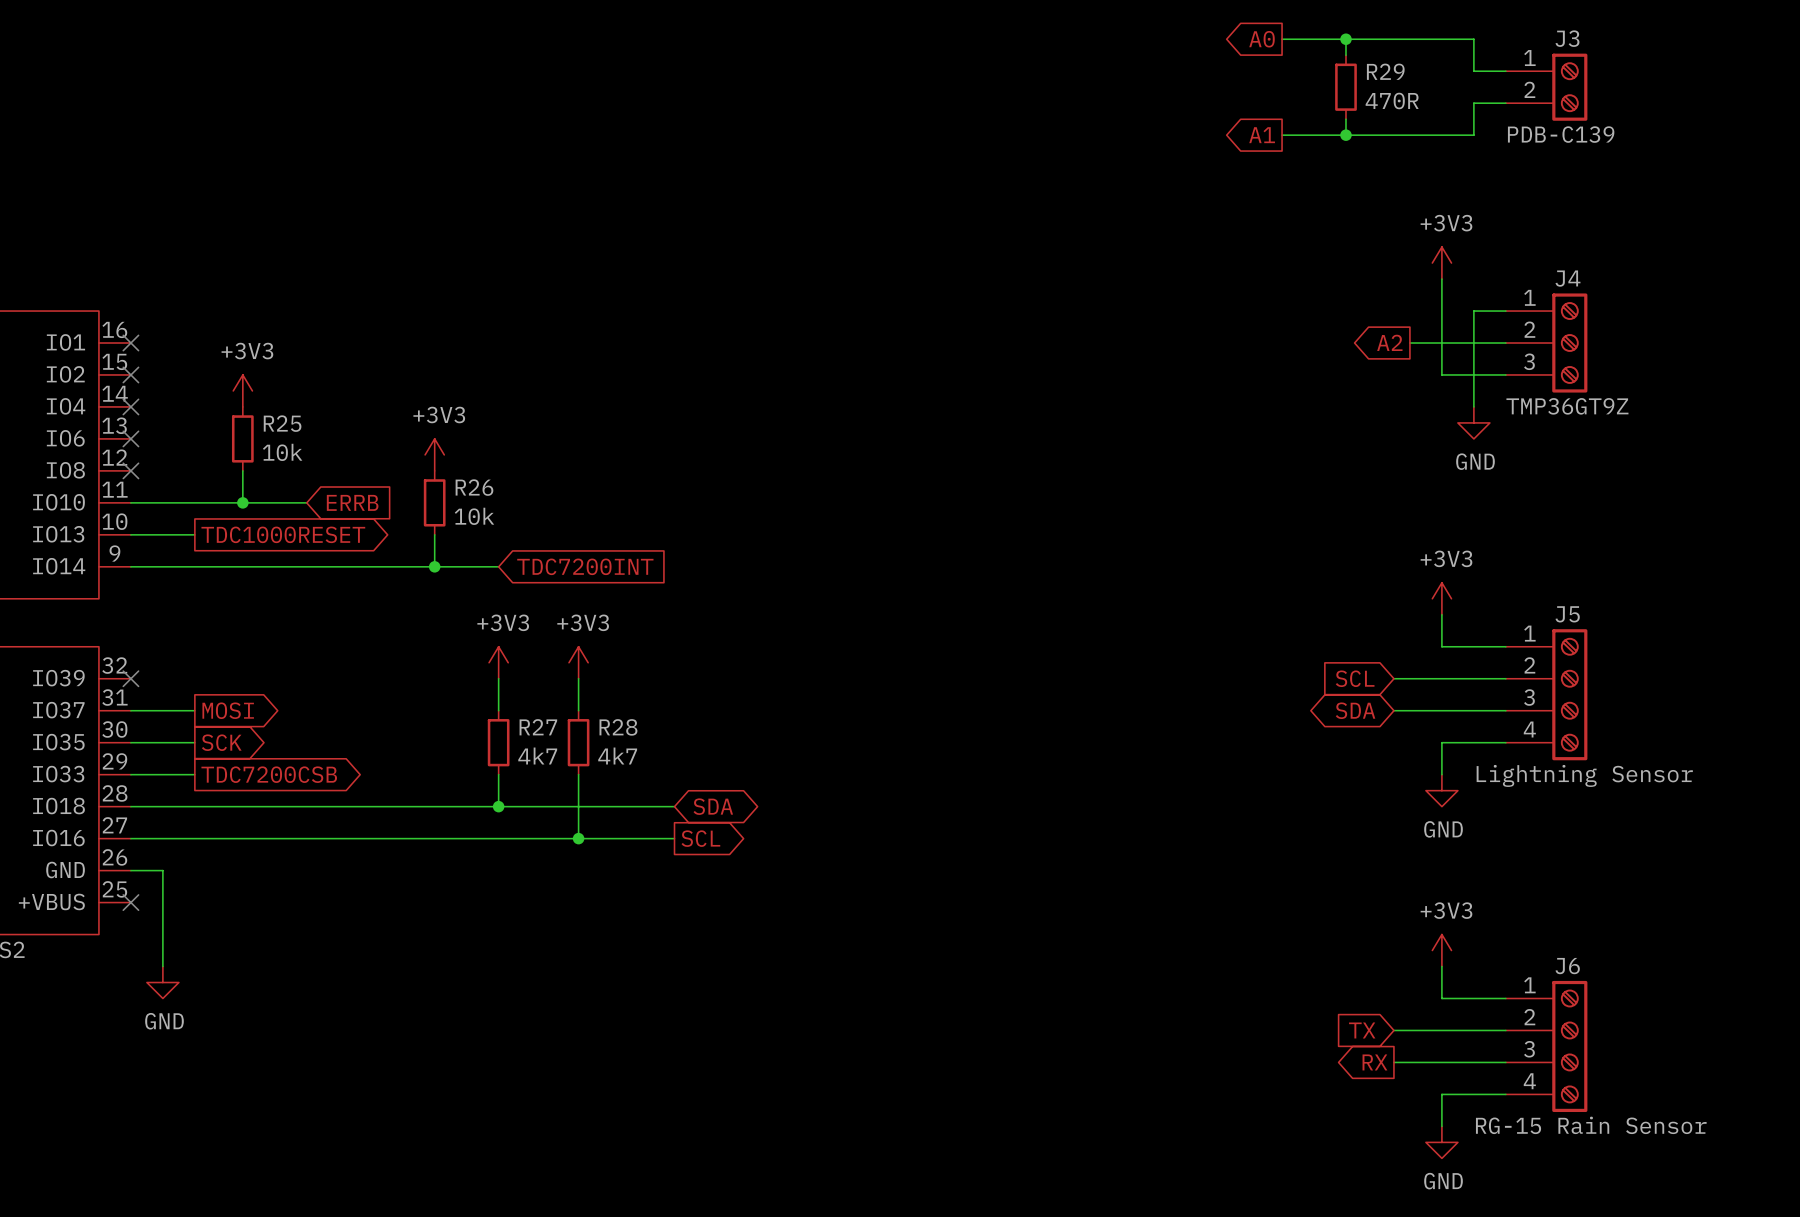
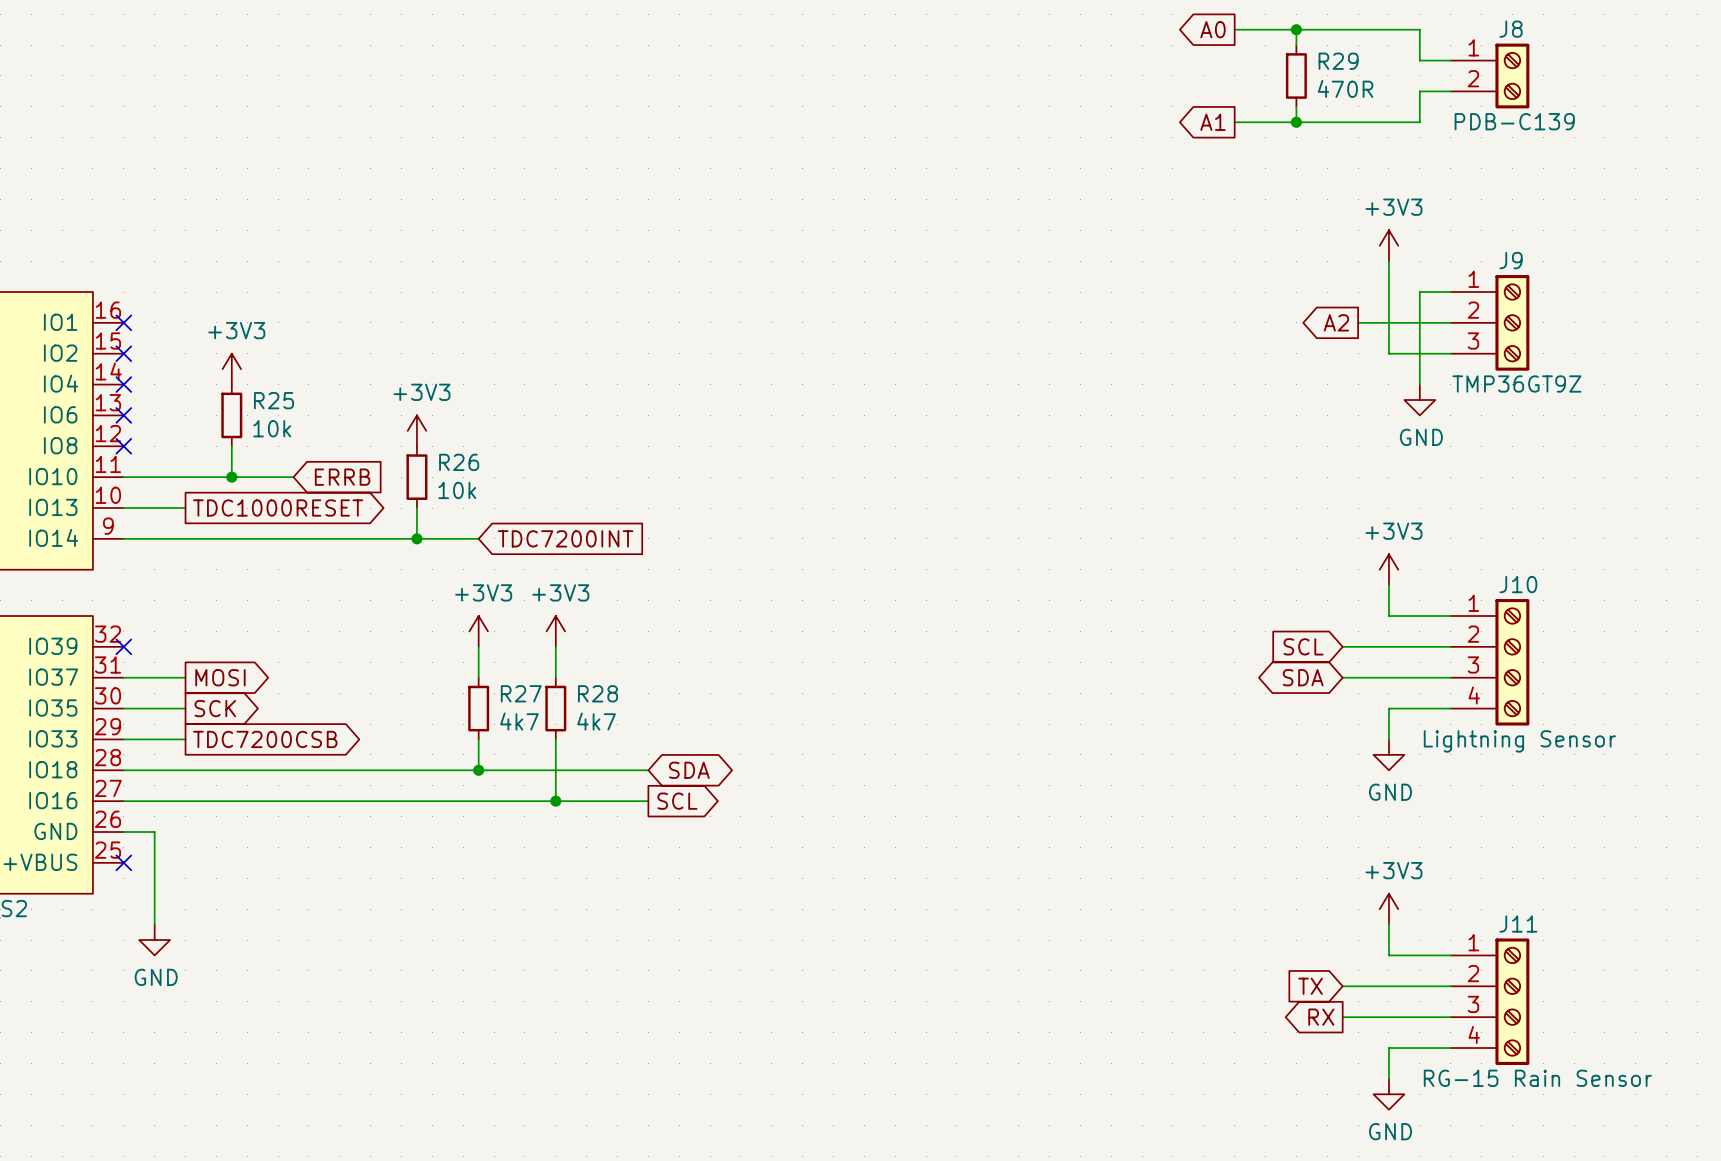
J3 name: J3 (1567, 38) -> J8 (1511, 29)
J4 name: J4 (1567, 278) -> J9 (1511, 260)
J5 name: J5 (1567, 614) -> J10 (1518, 584)
J6 name: J6 (1567, 966) -> J11 (1518, 924)

